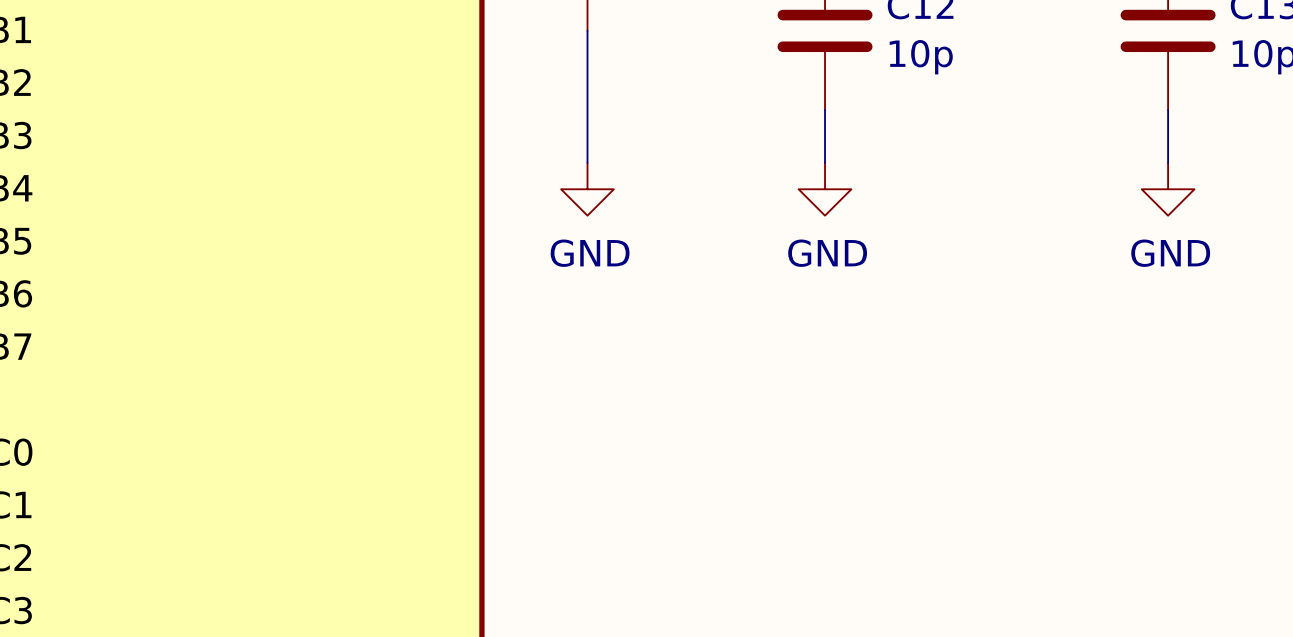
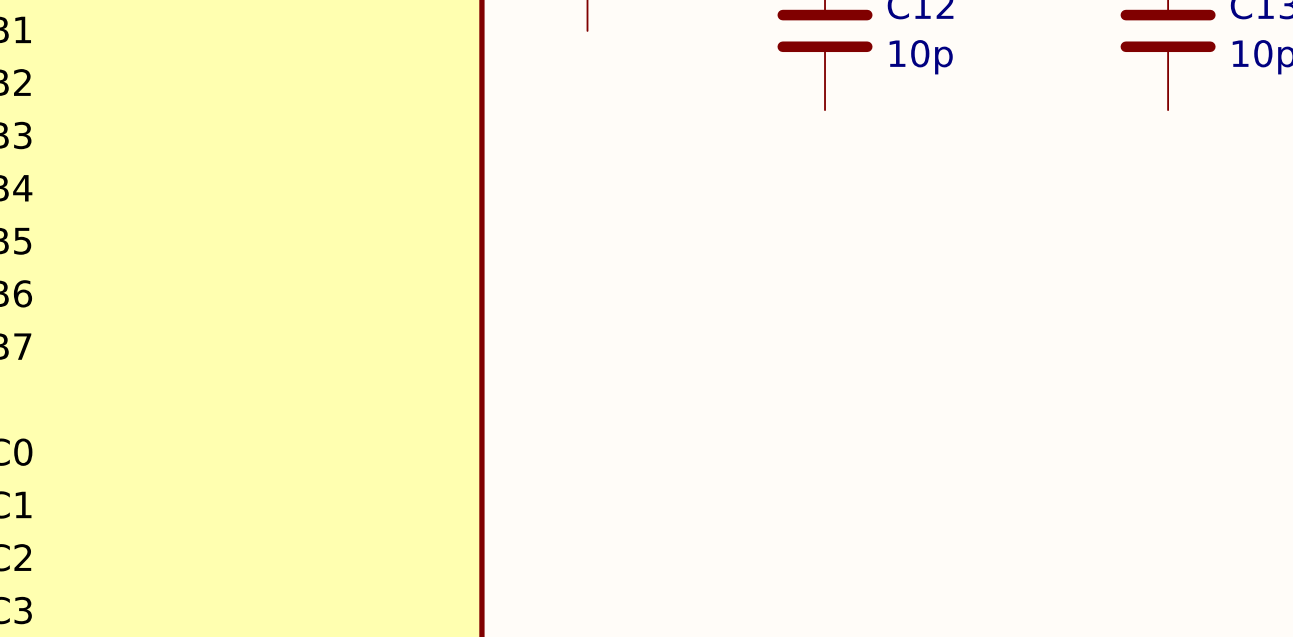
wire: (587, 30) (587, 162) -> none
wire: (825, 110) (825, 162) -> none
wire: (1168, 110) (1168, 162) -> none
power symbol: GND (587, 189) -> none
power symbol: GND (825, 189) -> none
power symbol: GND (1168, 189) -> none

